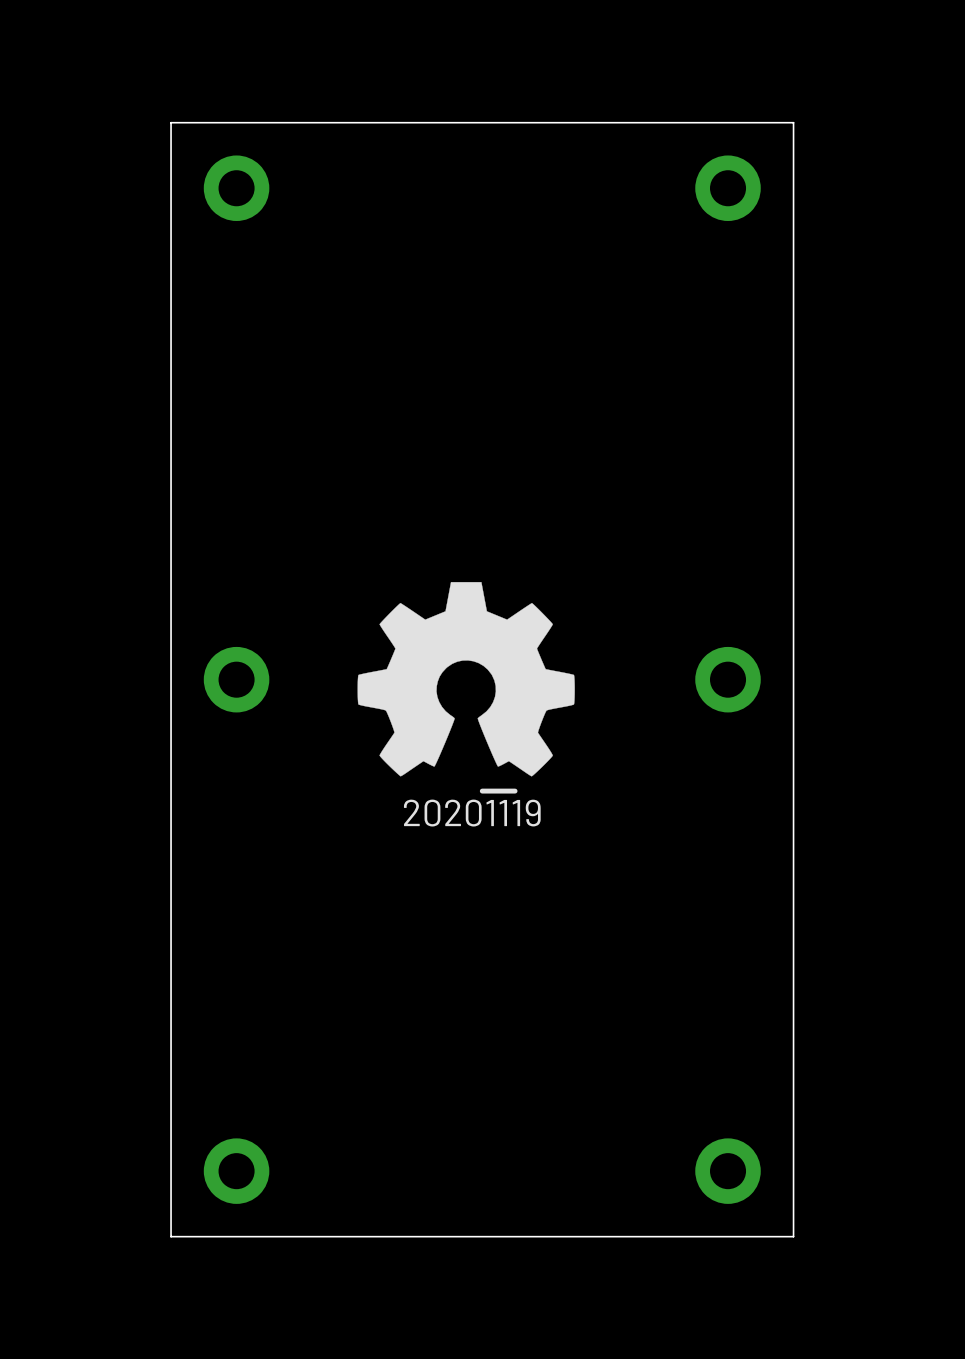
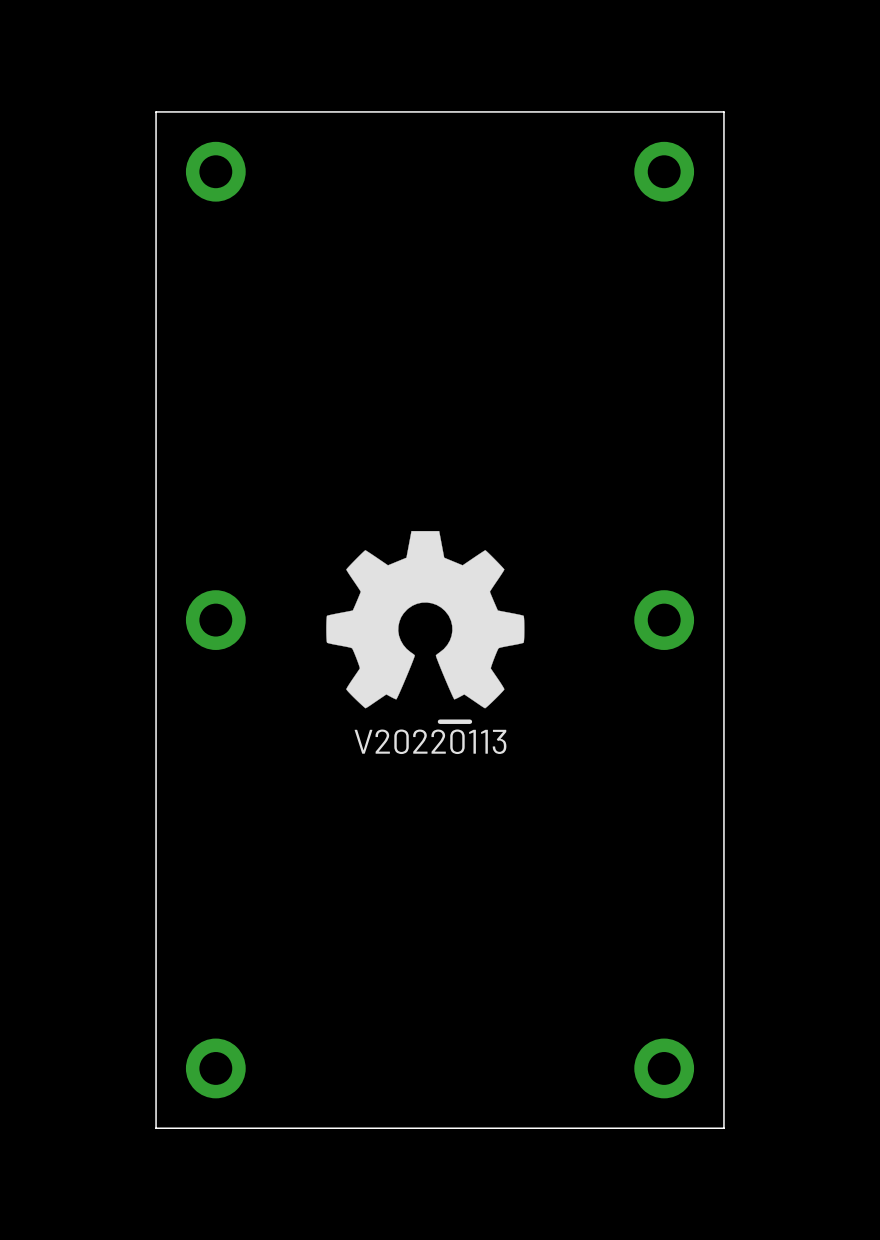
drawing shape: [403, 788, 541, 827] -> [354, 719, 507, 755]

